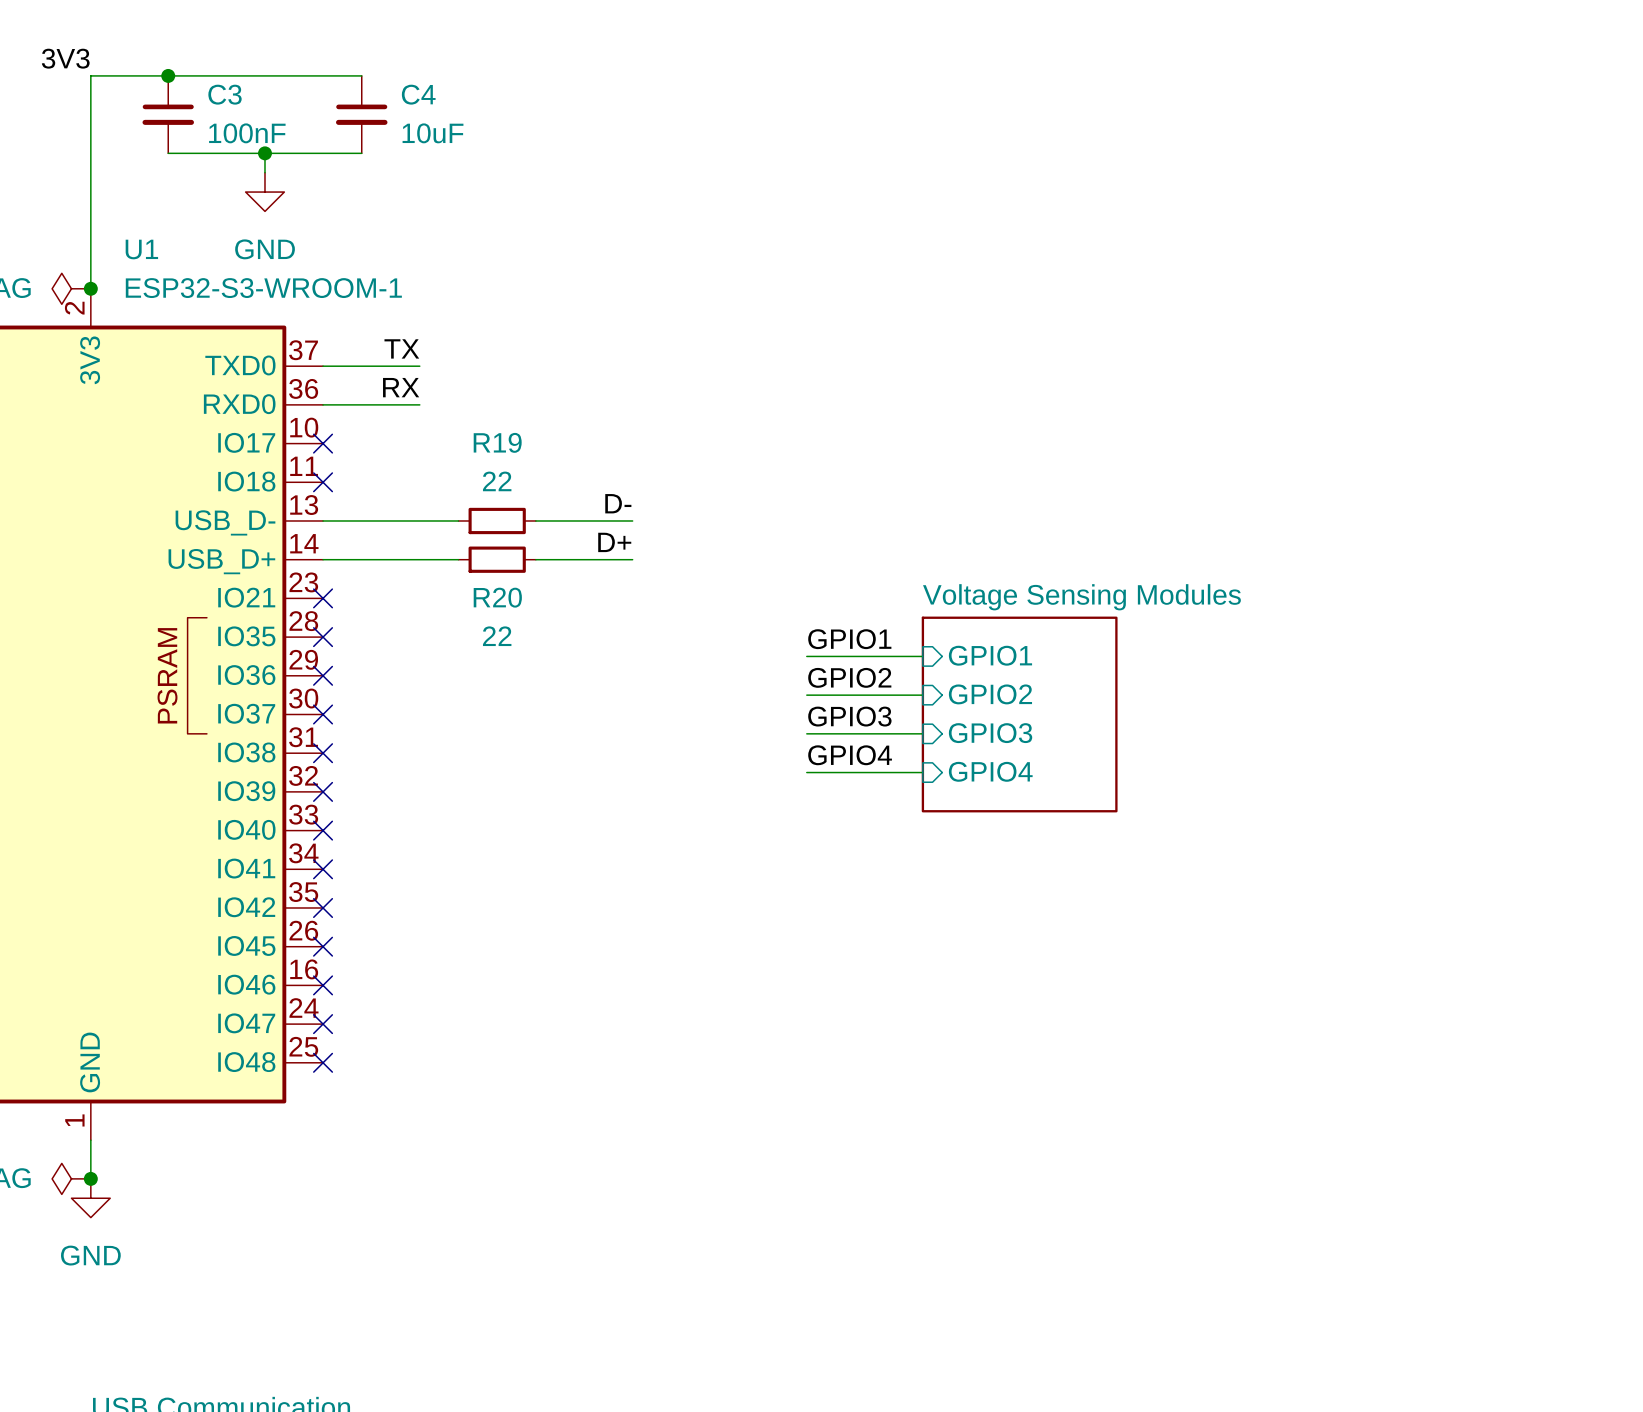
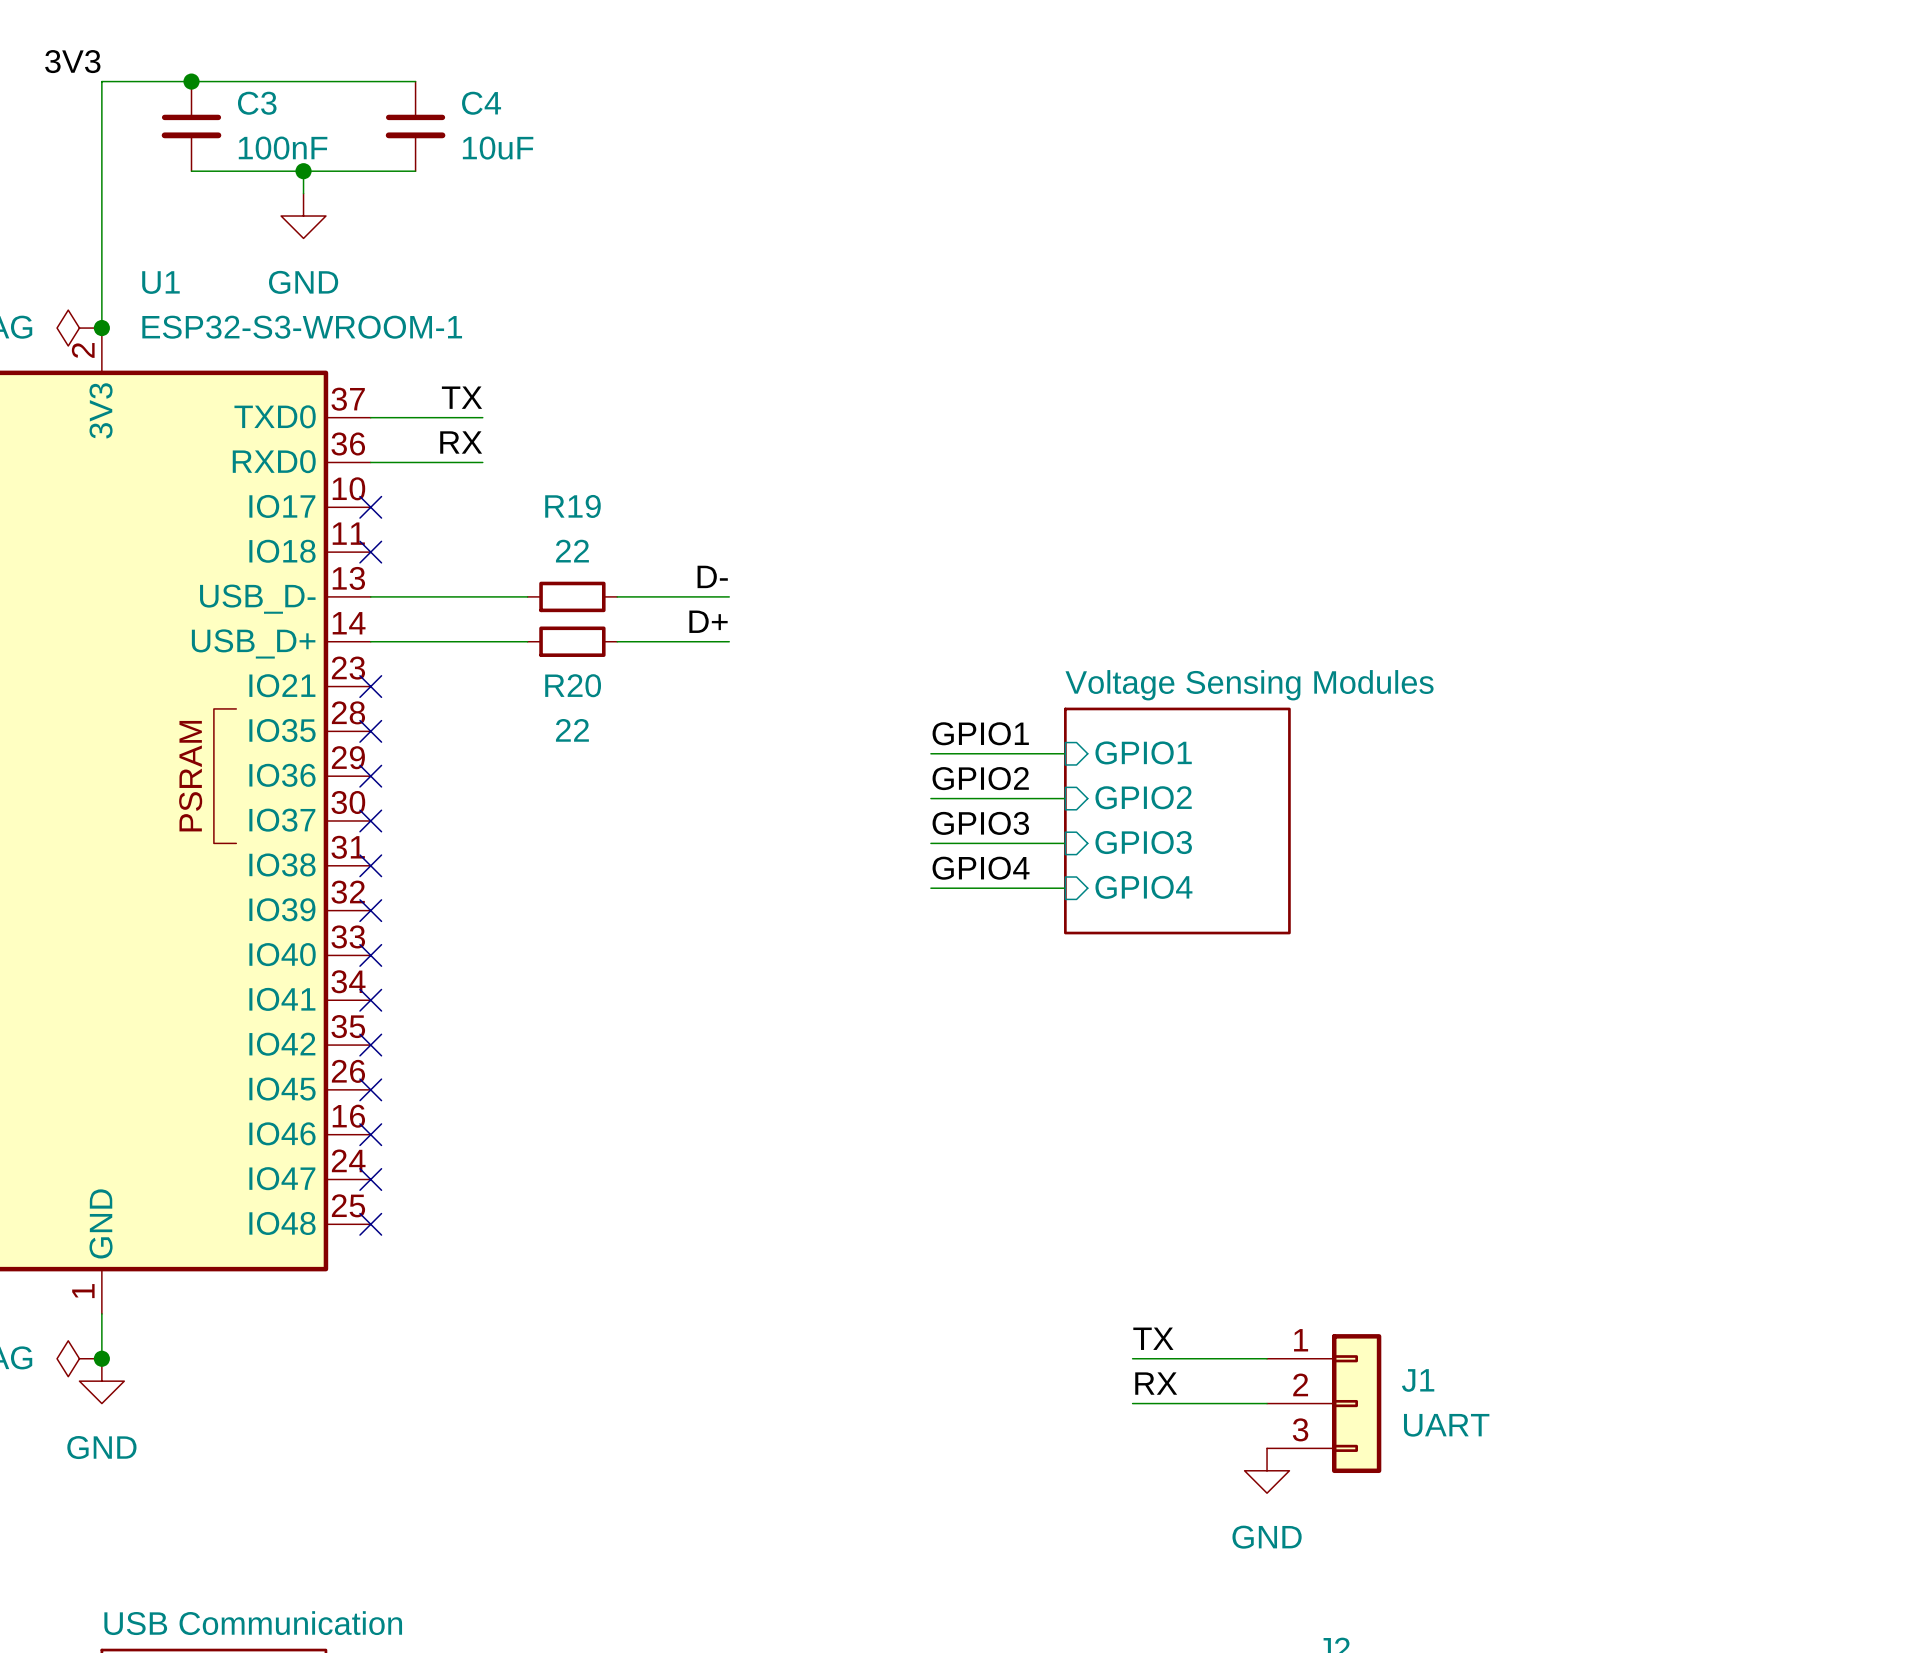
label: none -> TX (1153, 1338)
wire: none -> (1132, 1358) (1267, 1358)
label: none -> RX (1156, 1383)
wire: none -> (1132, 1403) (1267, 1403)
J1: none -> UART (1324, 1403)
power symbol: none -> GND (1267, 1470)

